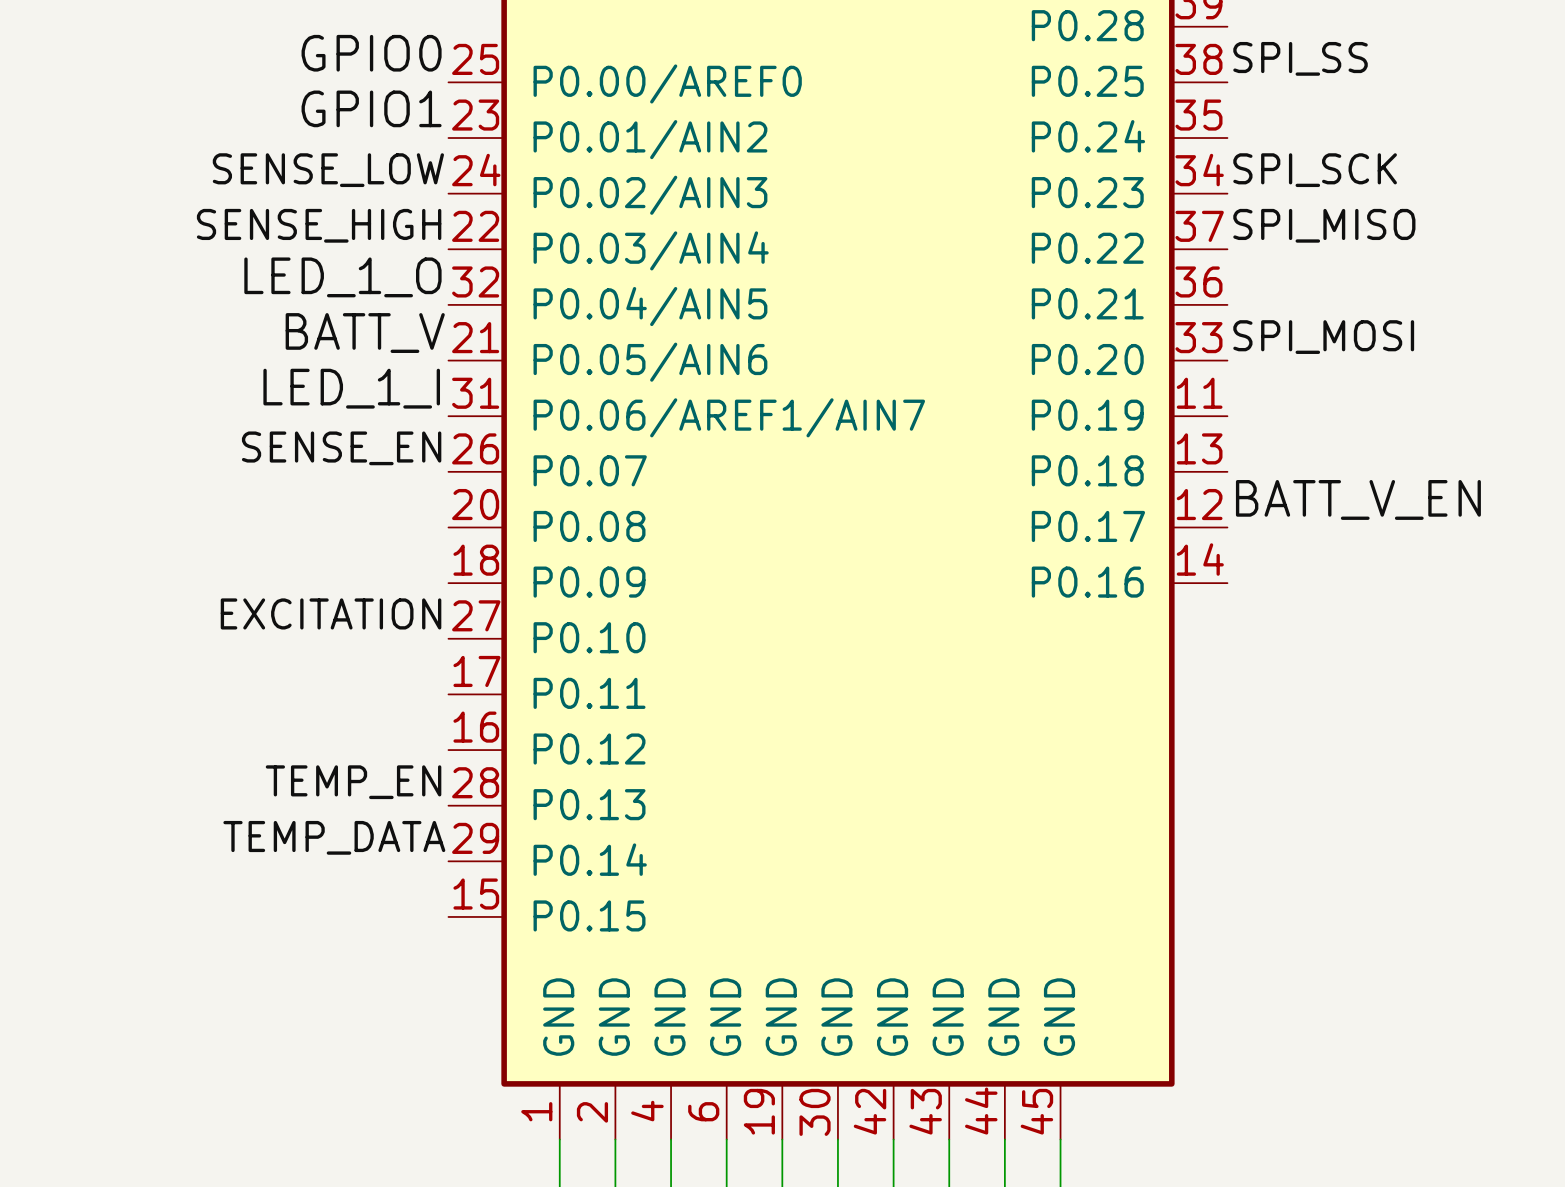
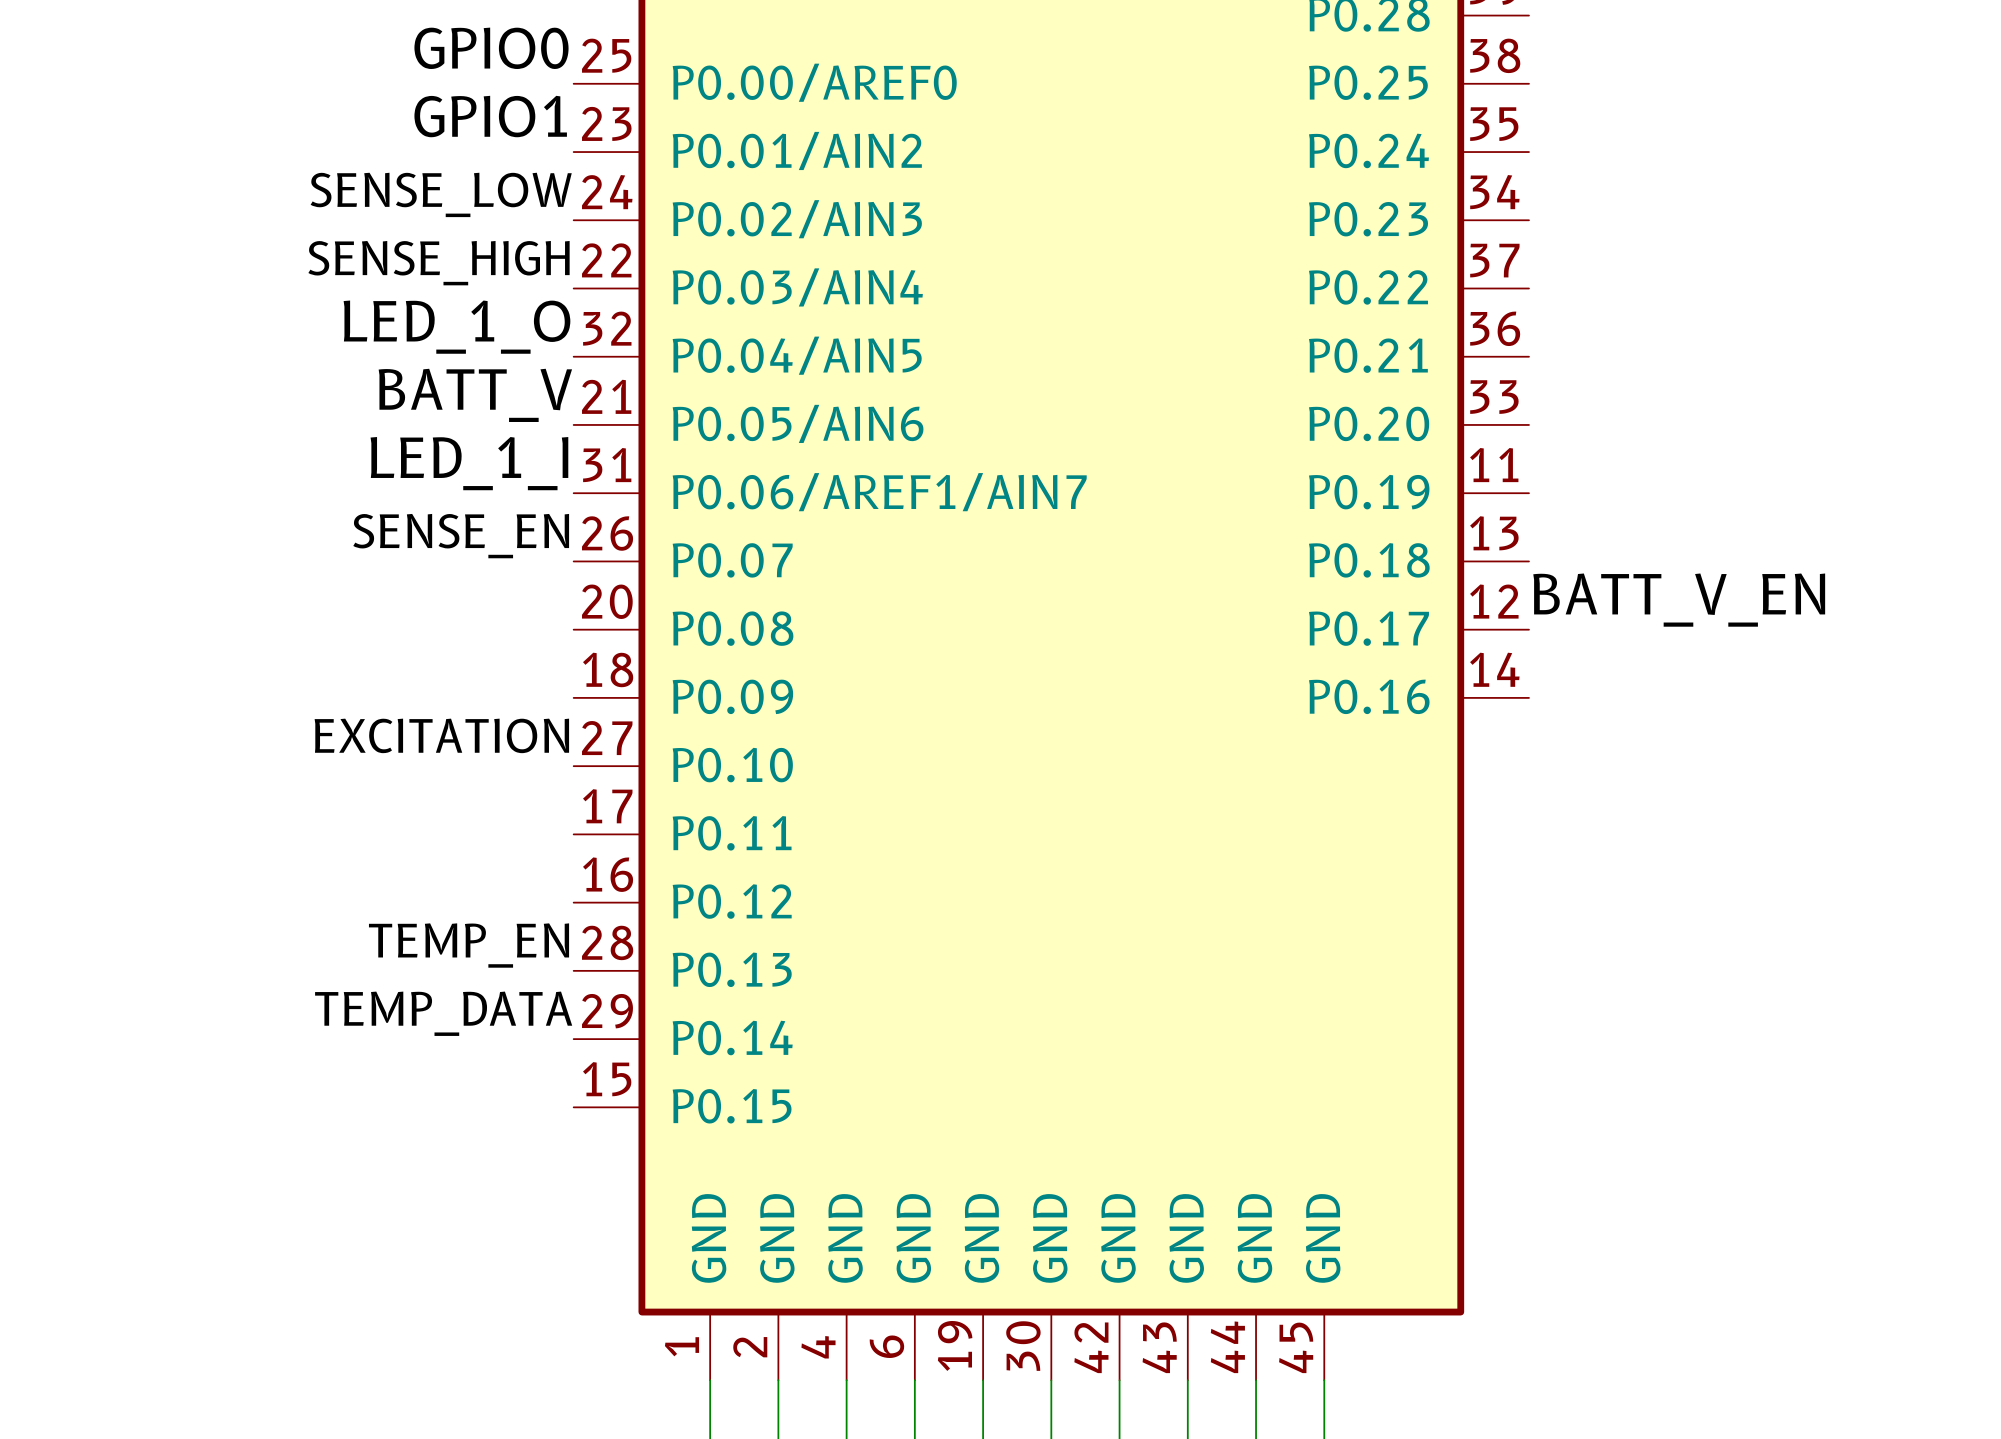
label: SPI_SS (1300, 58) -> none
label: SPI_SCK (1315, 170) -> none
label: SPI_MISO (1324, 225) -> none
label: SPI_MOSI (1323, 337) -> none

